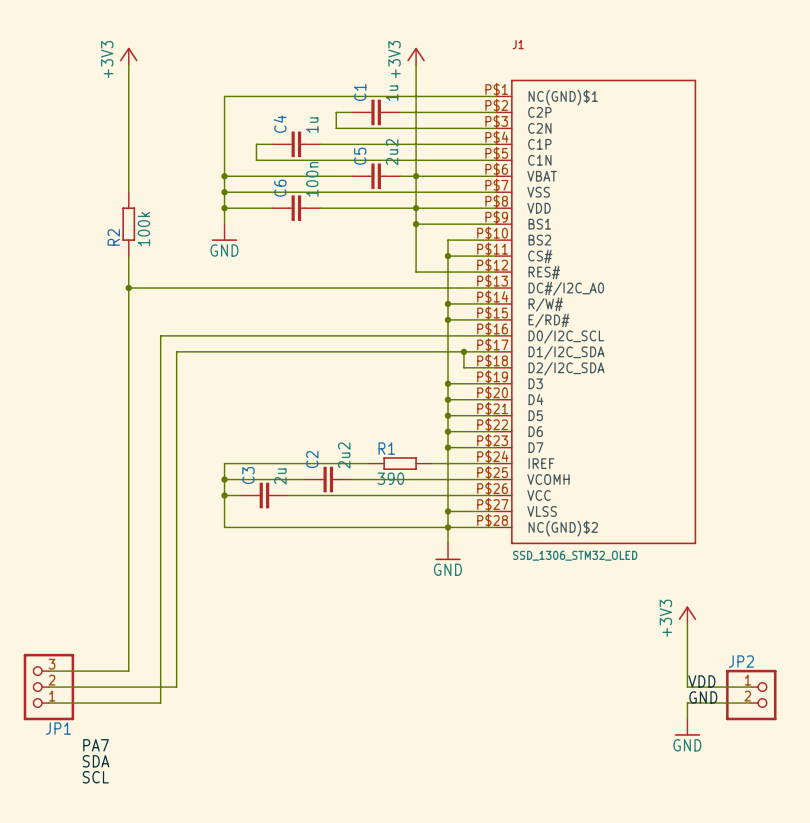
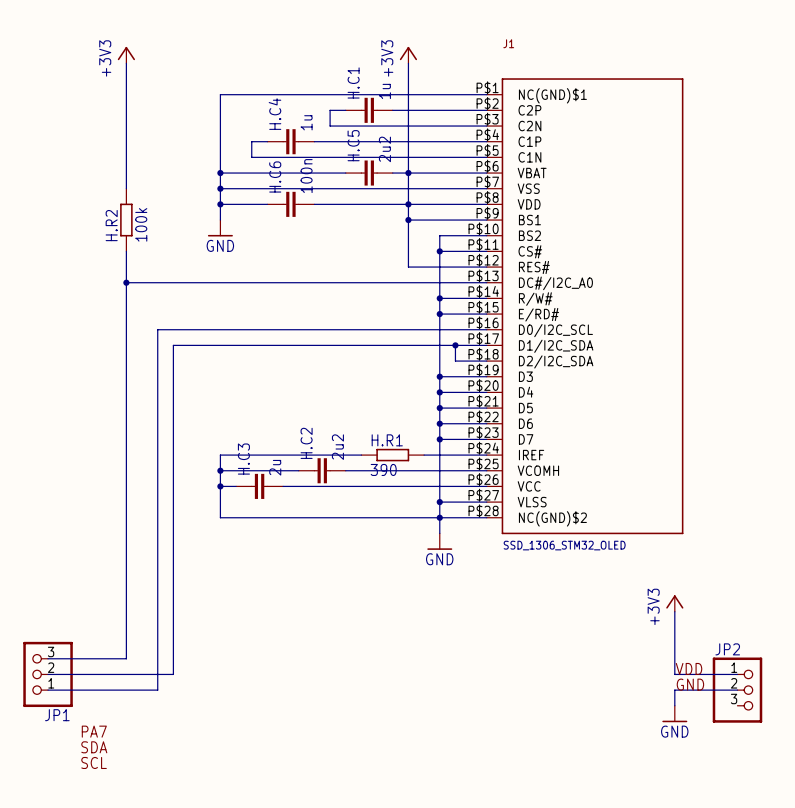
C1 name: C1 (360, 92) -> H.C1 (353, 82)
C4 name: C4 (280, 124) -> H.C4 (274, 114)
C5 name: C5 (360, 156) -> H.C5 (353, 145)
C6 name: C6 (280, 188) -> H.C6 (275, 176)
R2 name: R2 (113, 237) -> H.R2 (111, 225)
R1 name: R1 (386, 448) -> H.R1 (387, 440)
C2 name: C2 (312, 459) -> H.C2 (306, 443)
C3 name: C3 (248, 475) -> H.C3 (243, 459)
JP2 symbol: [726, 669, 777, 721] -> [712, 657, 763, 723]

